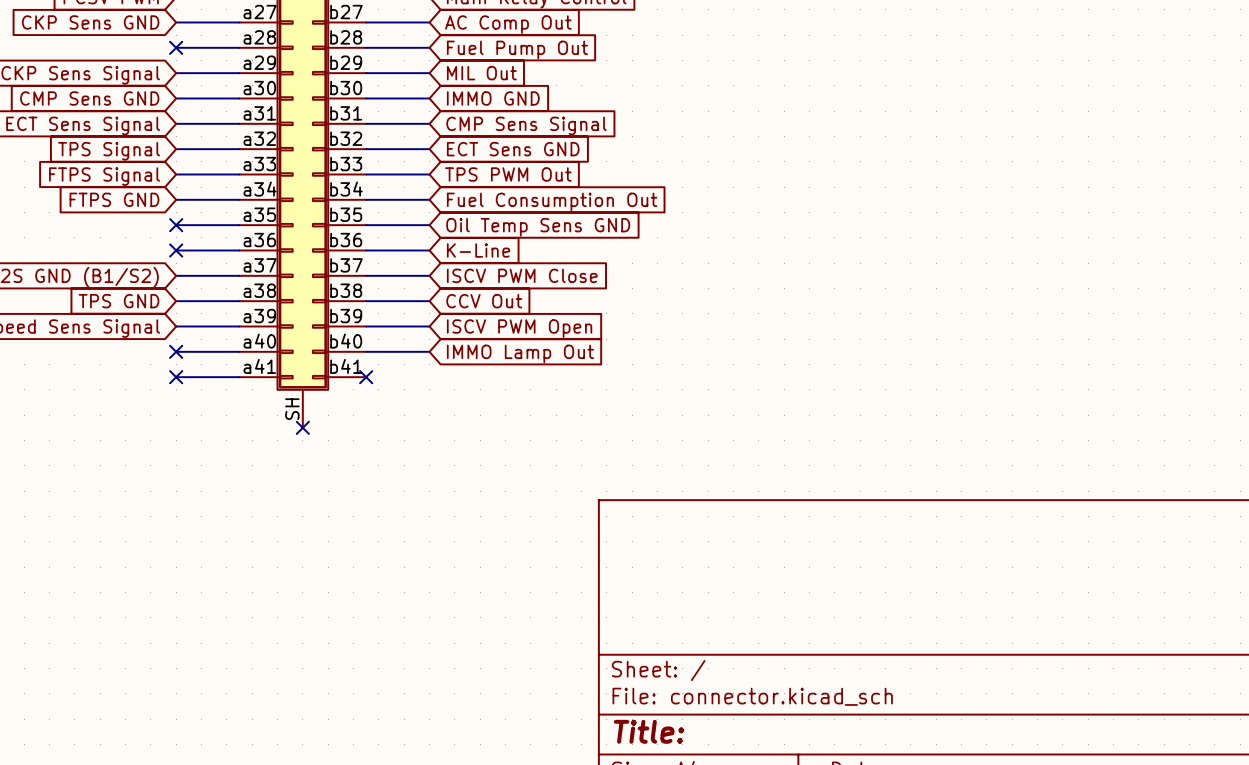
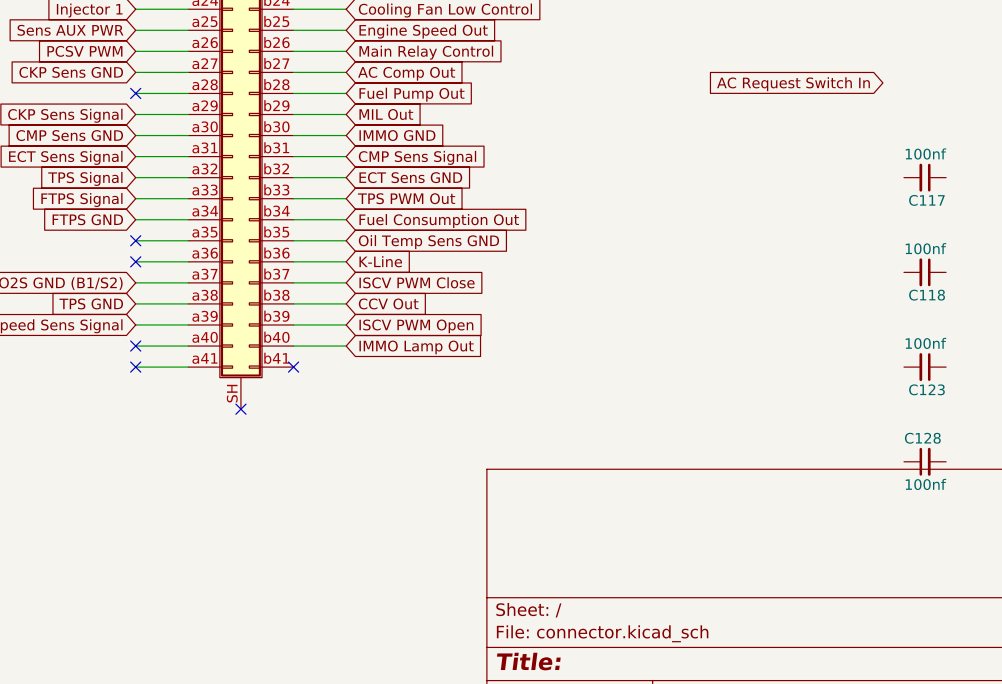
global label: none -> AC Request Switch In (793, 84)
C117: none -> 100nf (925, 177)
C118: none -> 100nf (925, 272)
C123: none -> 100nf (925, 367)
C128: none -> 100nf (925, 461)

